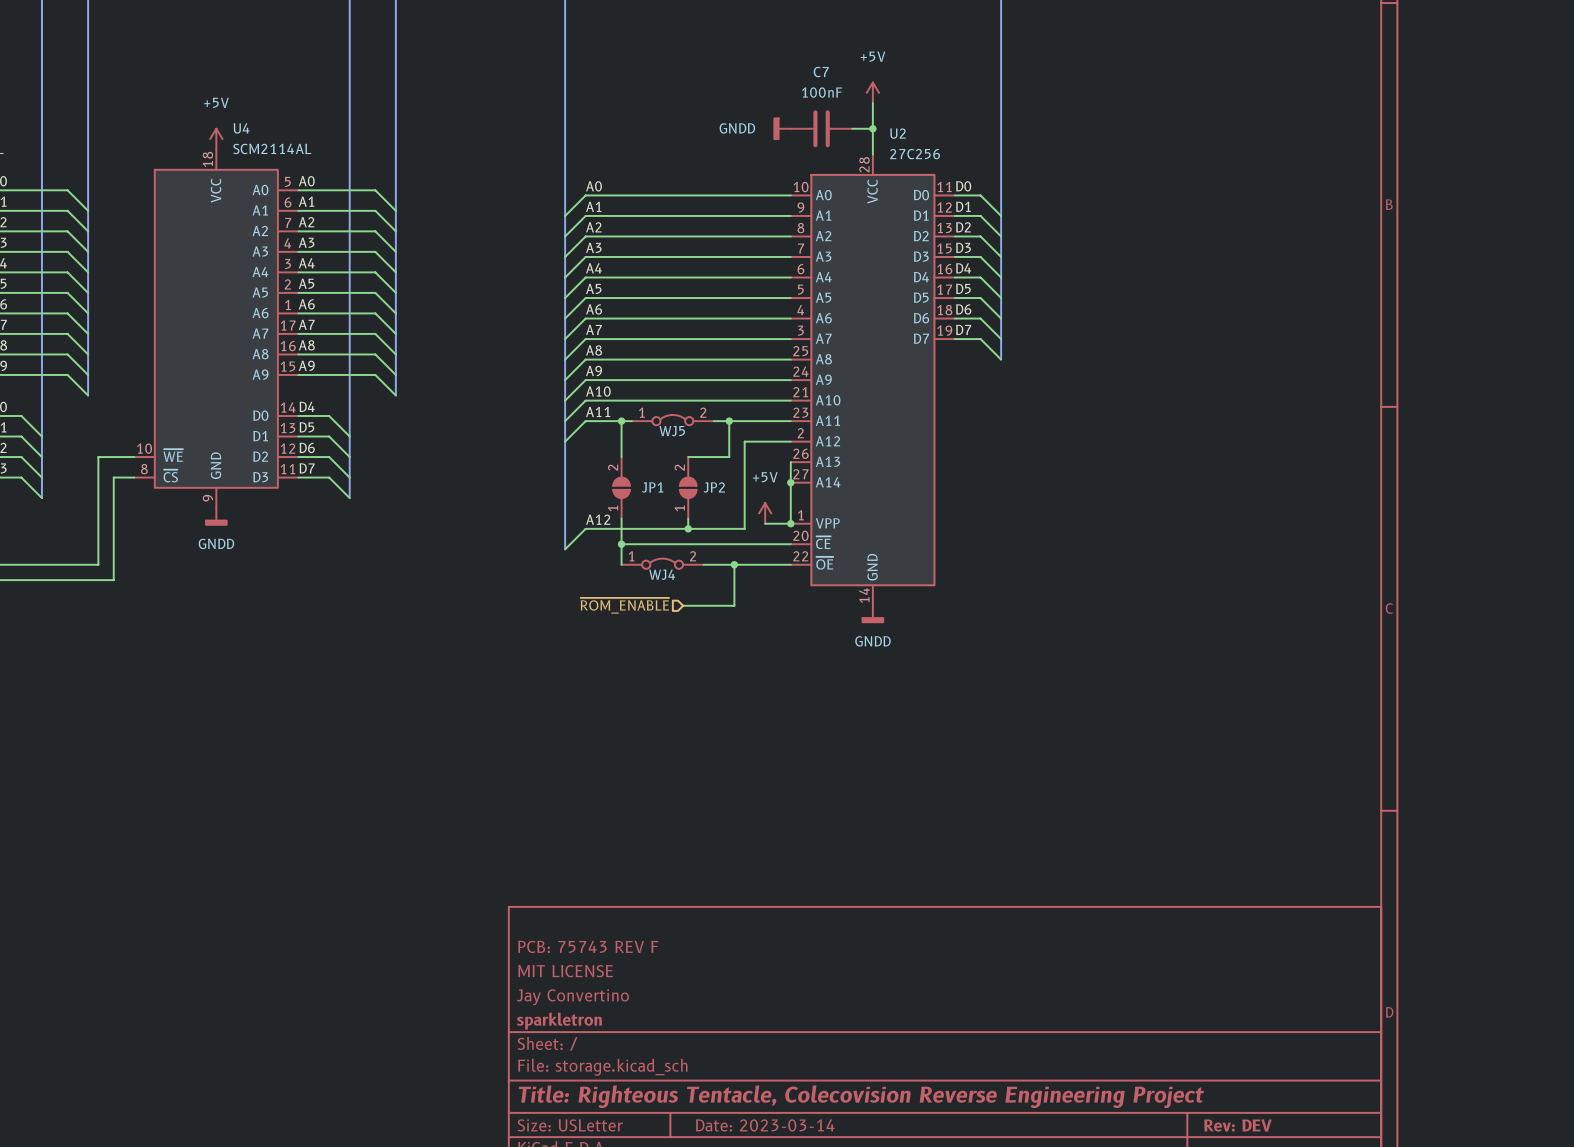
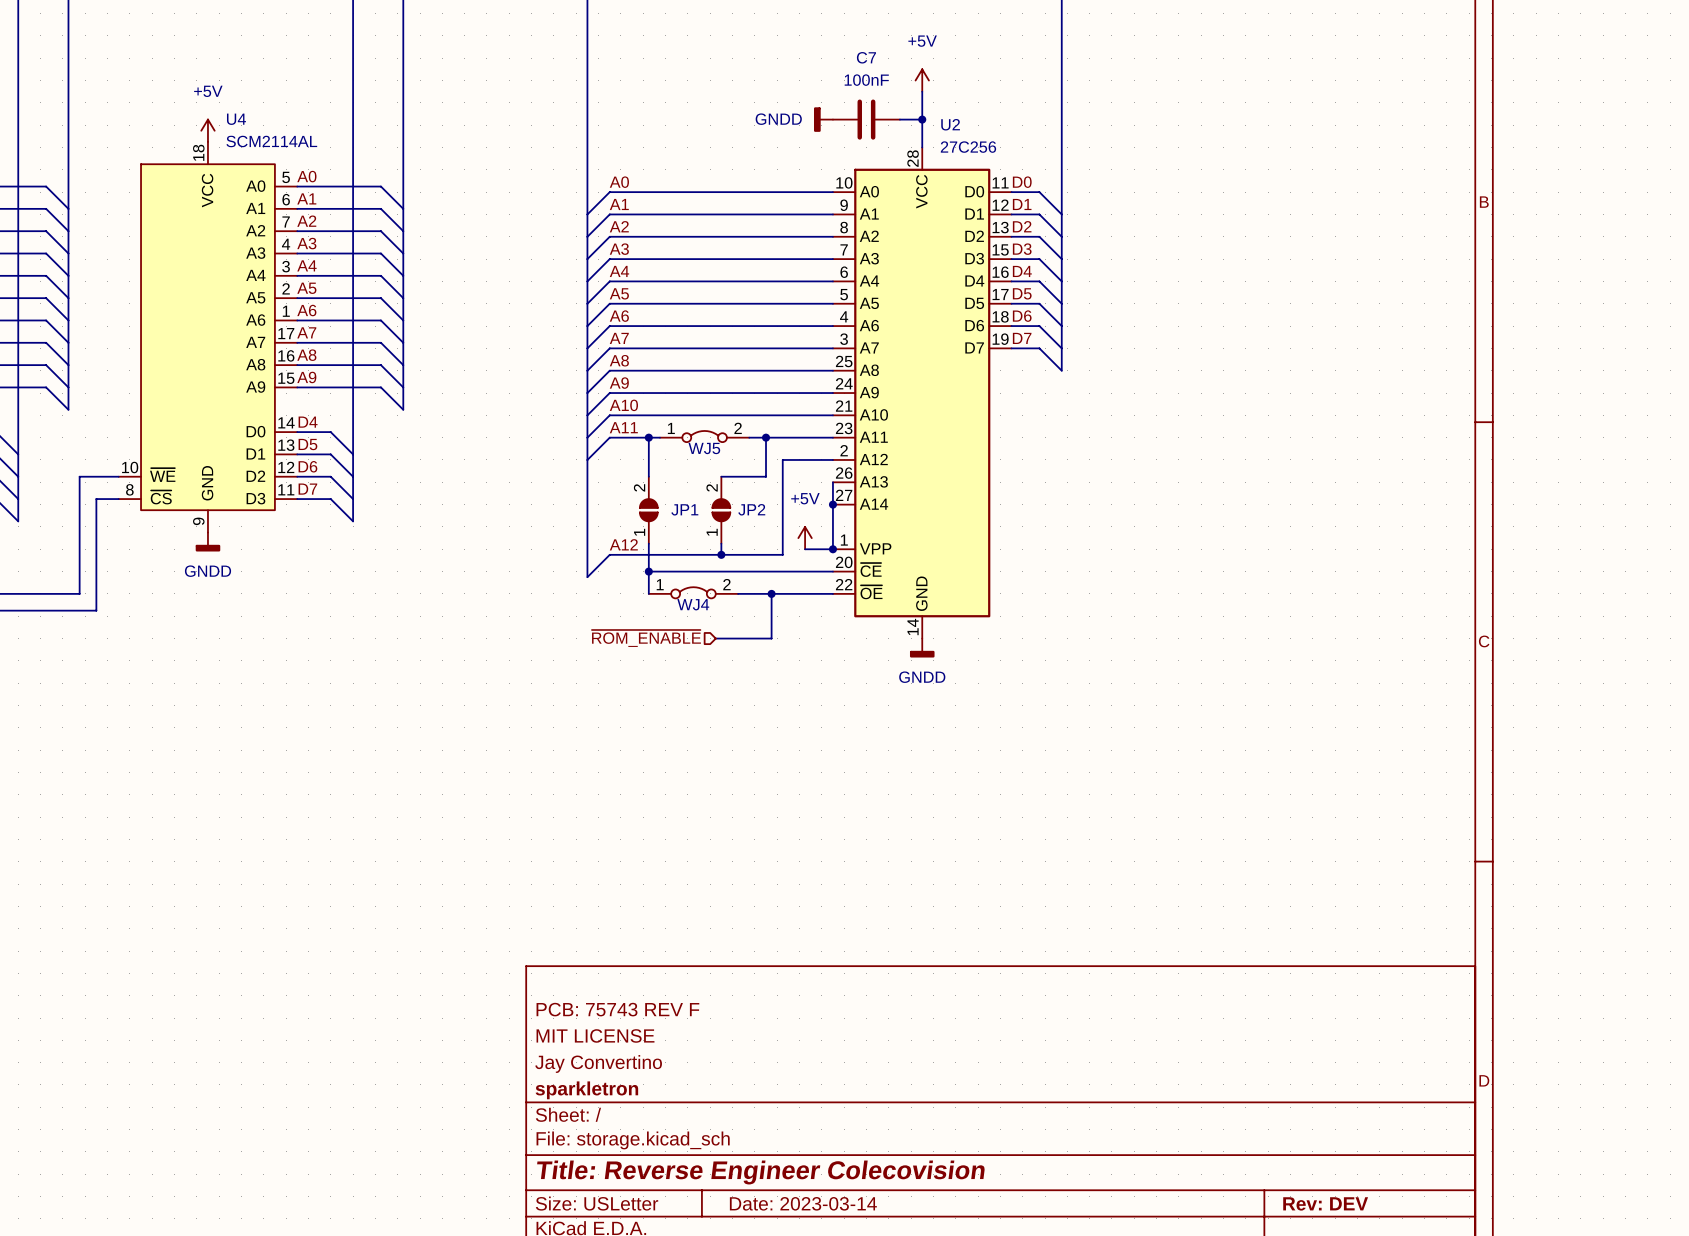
title block: Title: Righteous Tentacle, Colecovision Reverse Engineering Project (861, 1096) -> Title: Reverse Engineer Colecovision (760, 1172)

